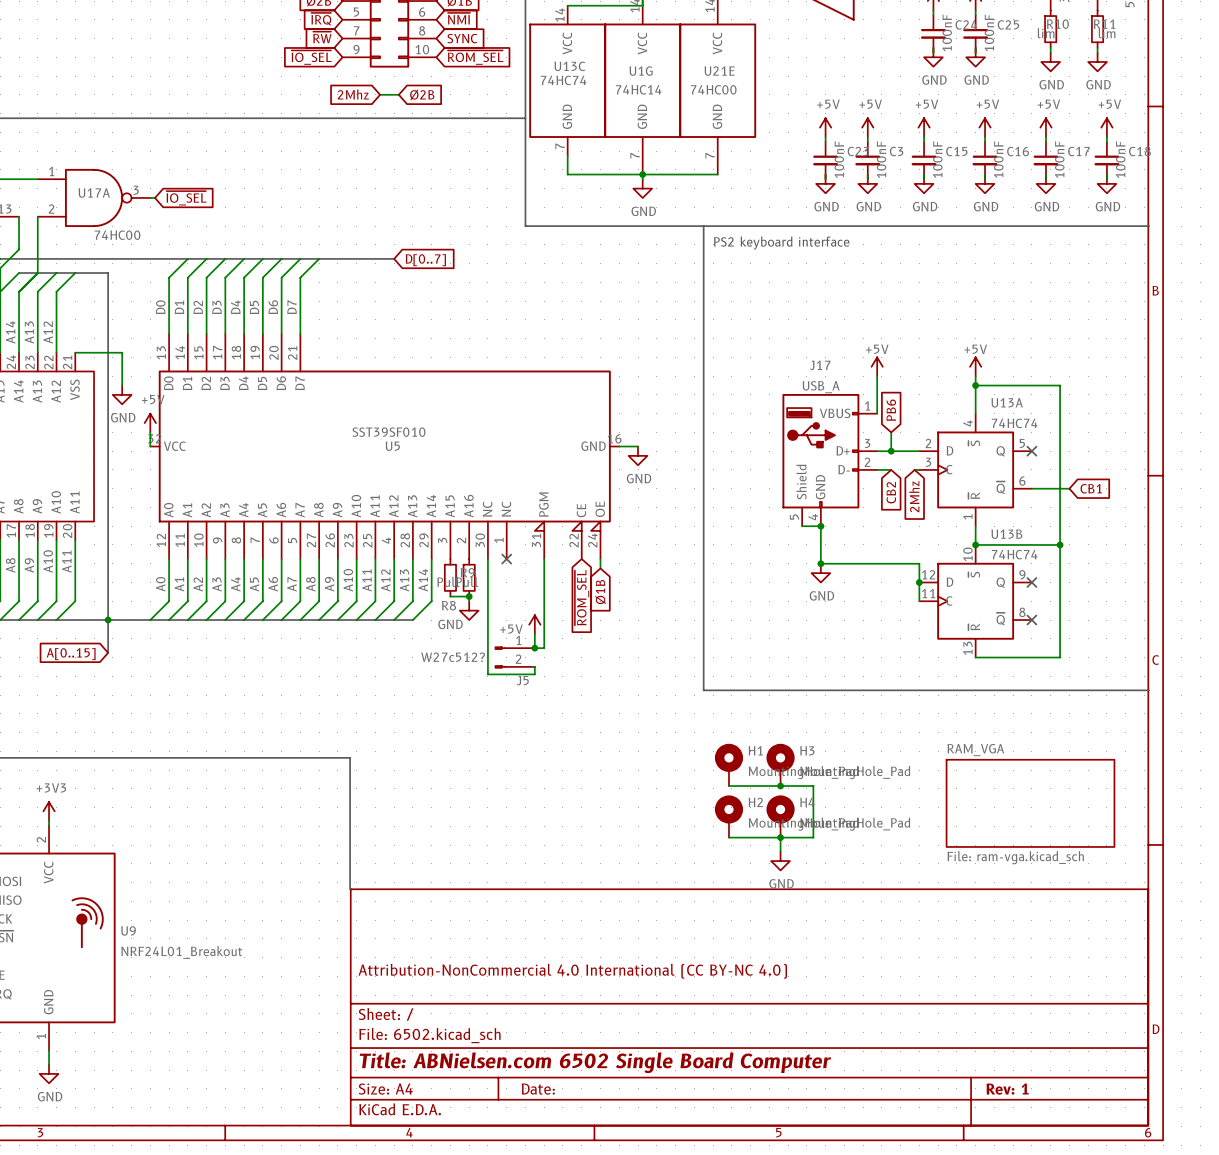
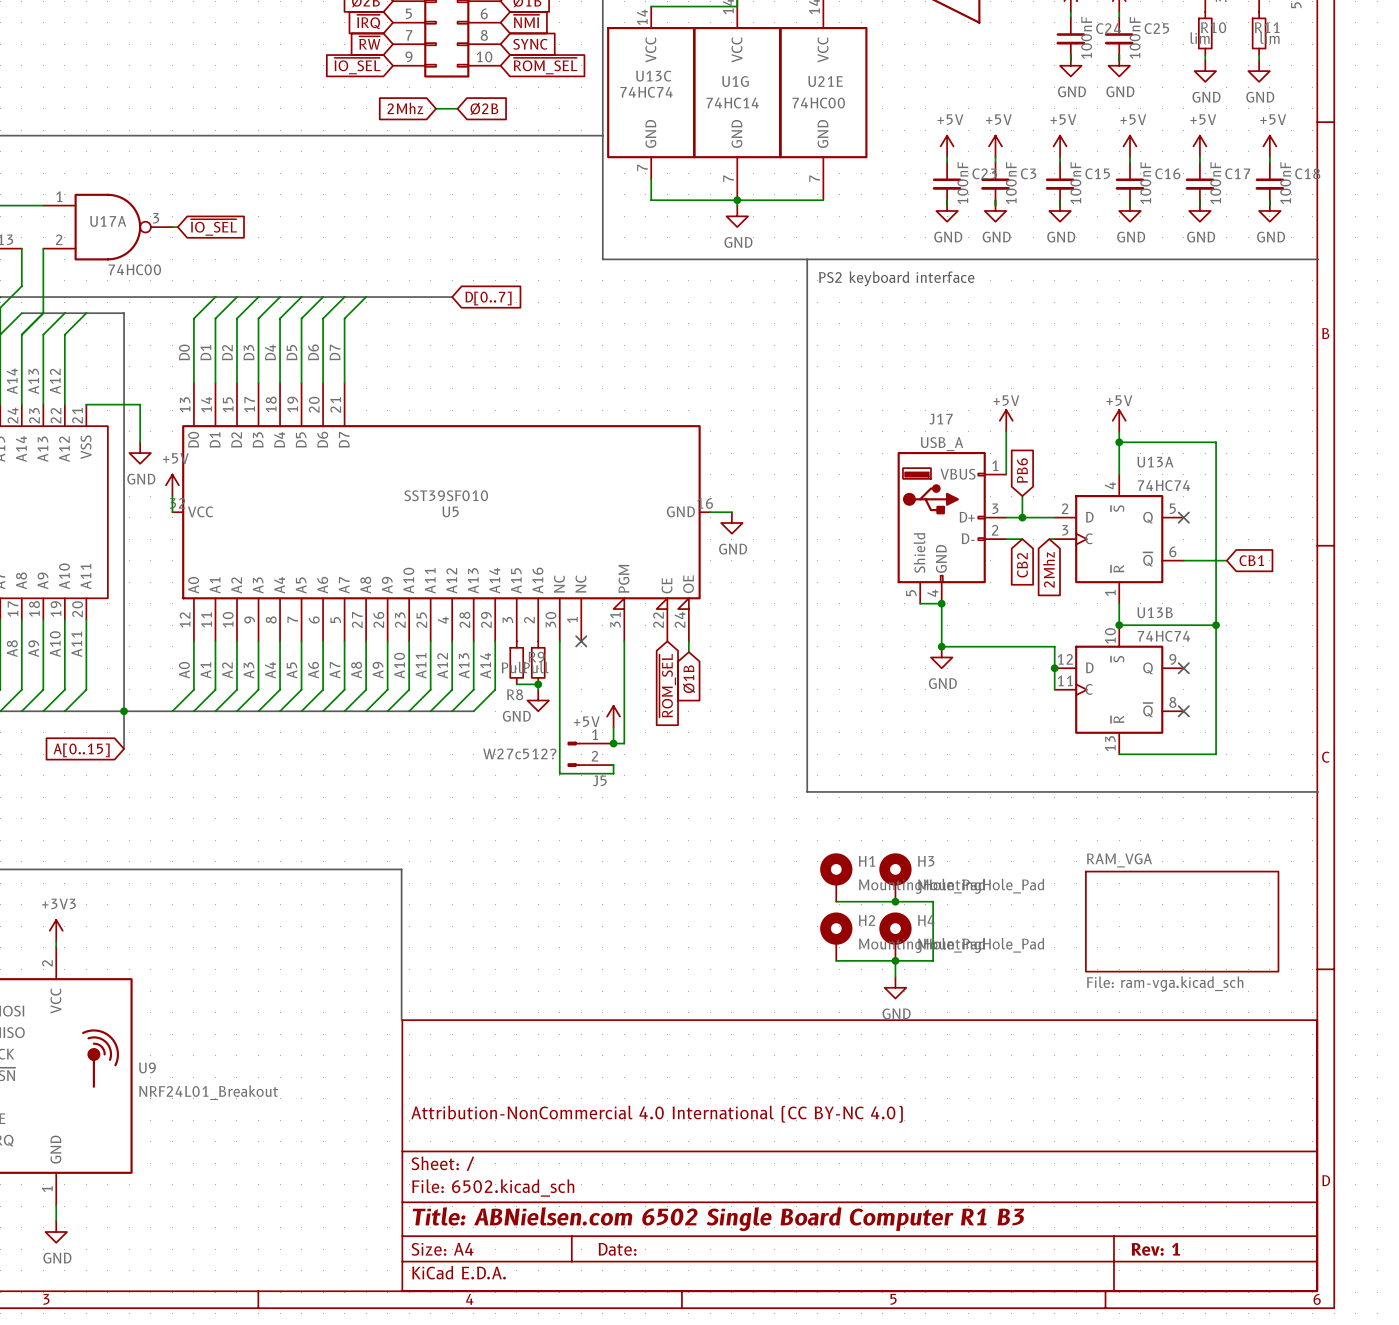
title block: Title: ABNielsen.com 6502 Single Board Computer (595, 1062) -> Title: ABNielsen.com 6502 Single Board Computer R1 B3 (718, 1219)

